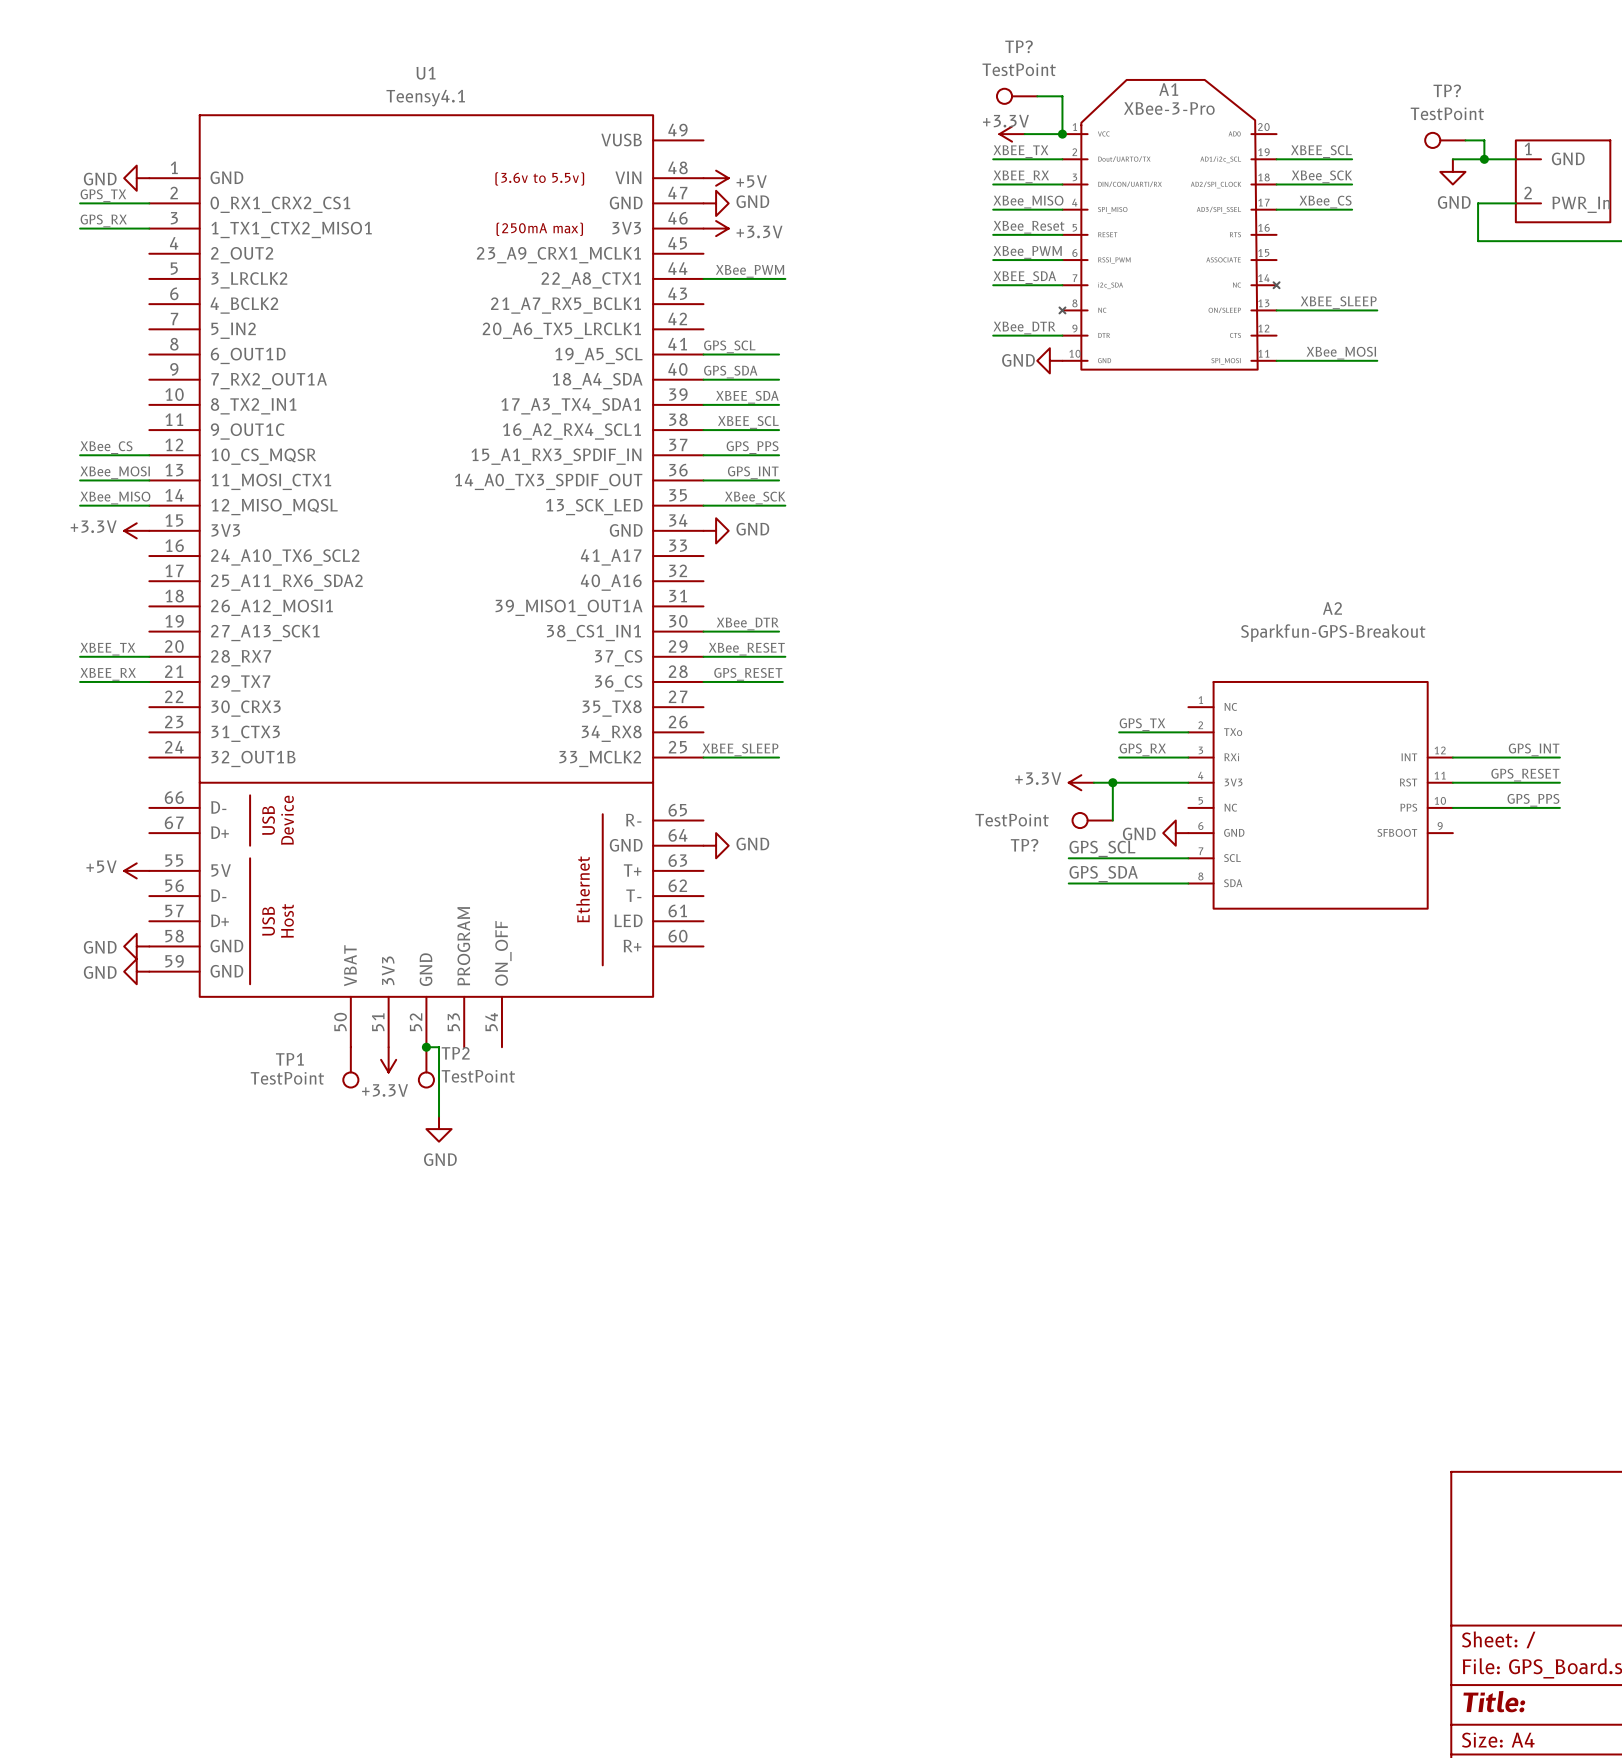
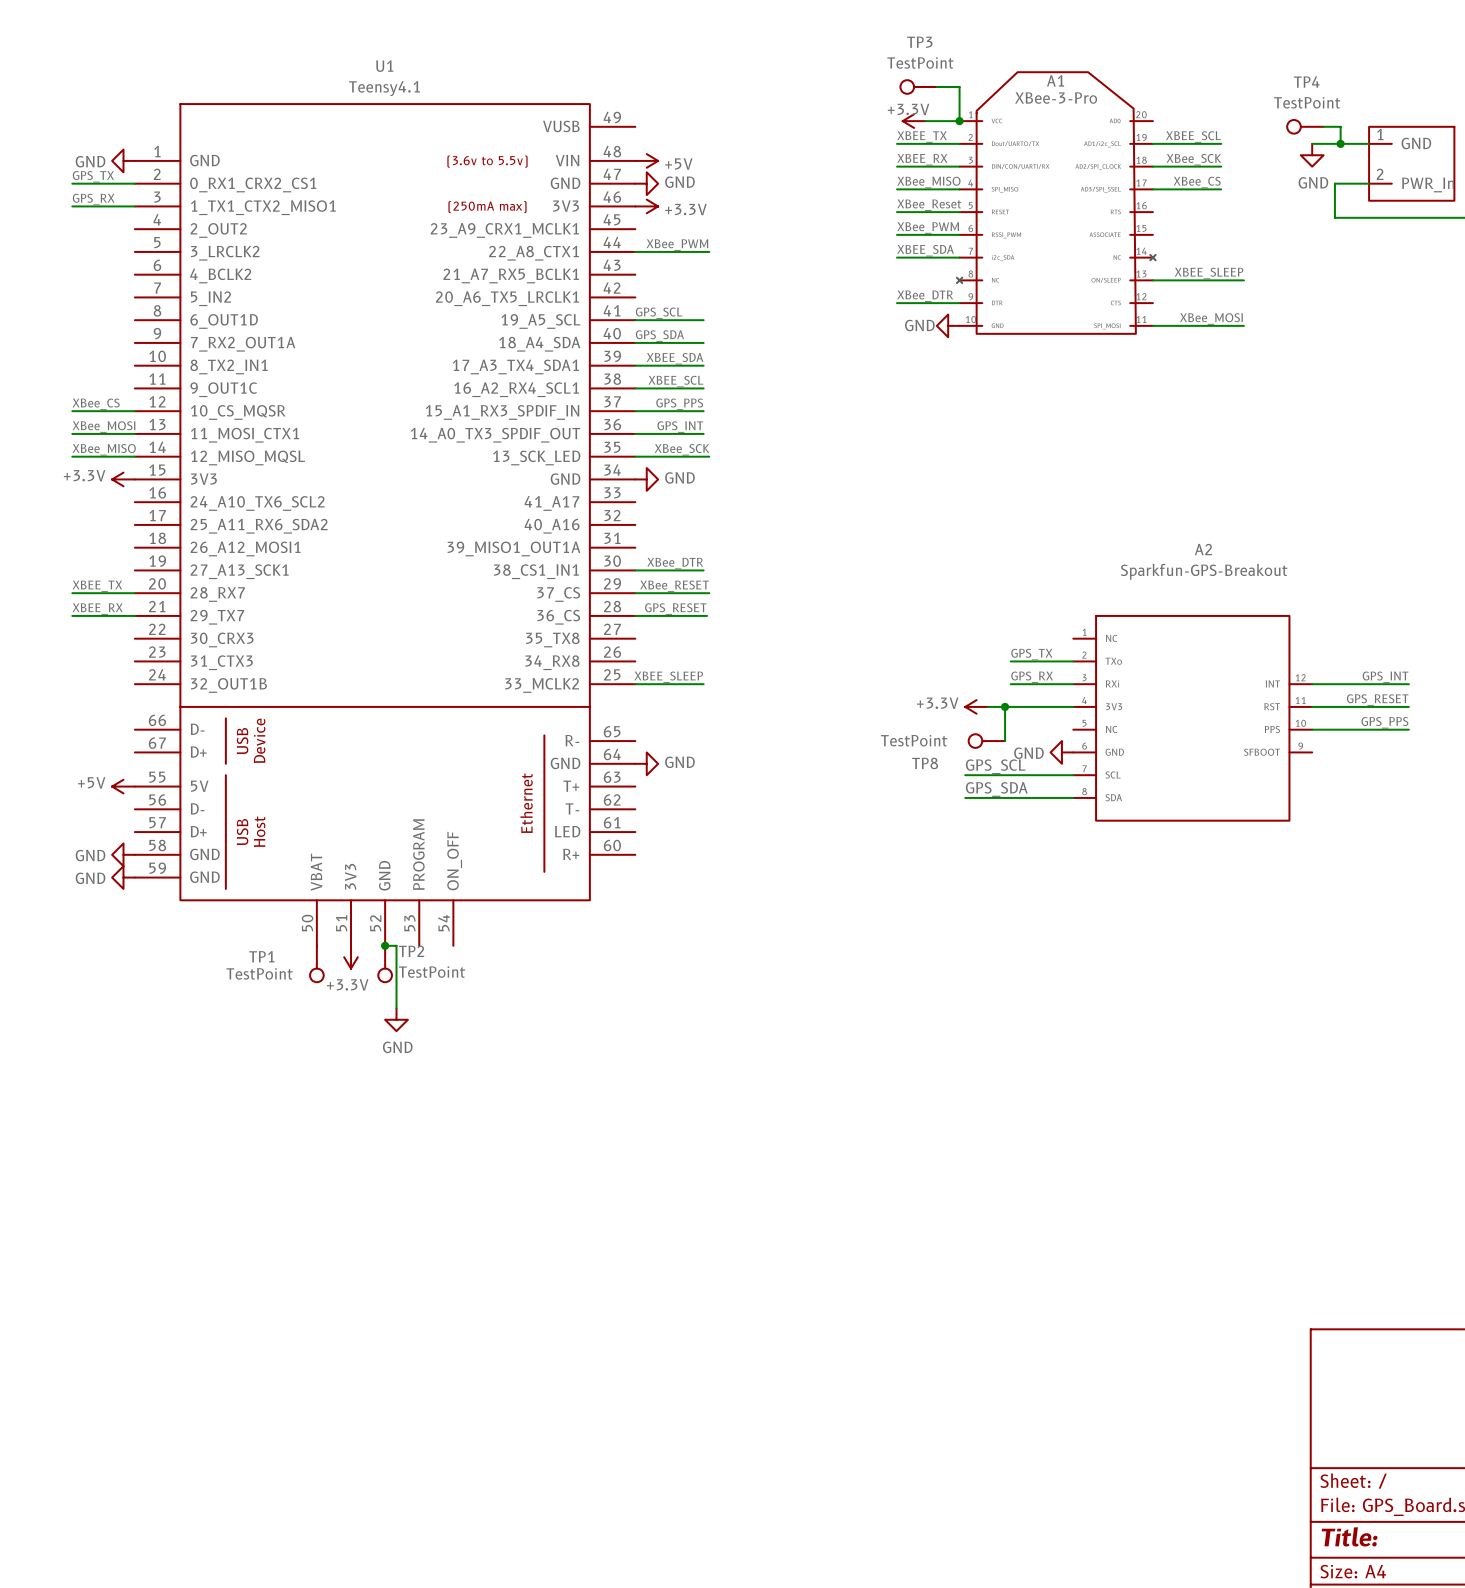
TP? name: TP? (1019, 46) -> TP3 (919, 42)
TP? name: TP? (1447, 90) -> TP4 (1306, 82)
TP? name: TP? (1024, 845) -> TP8 (925, 763)

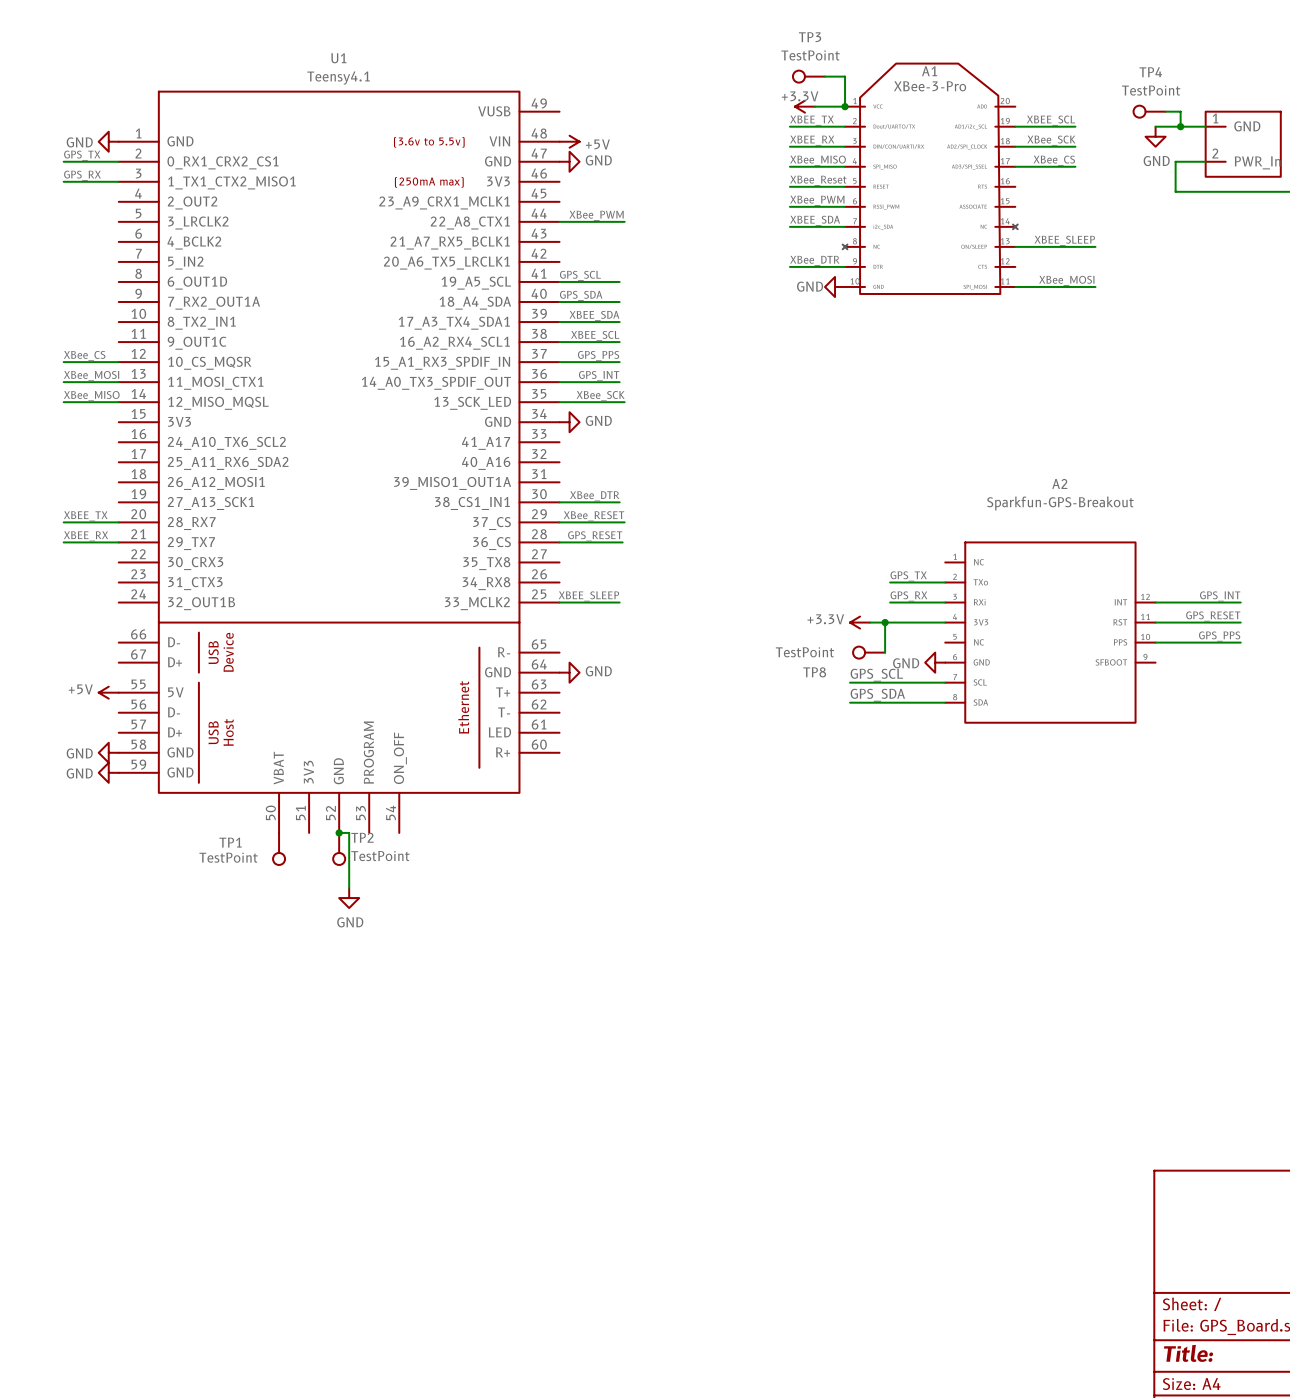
power symbol: +3.3V (646, 206) -> none
power symbol: +3.3V (123, 479) -> none
power symbol: +3.3V (351, 957) -> none

